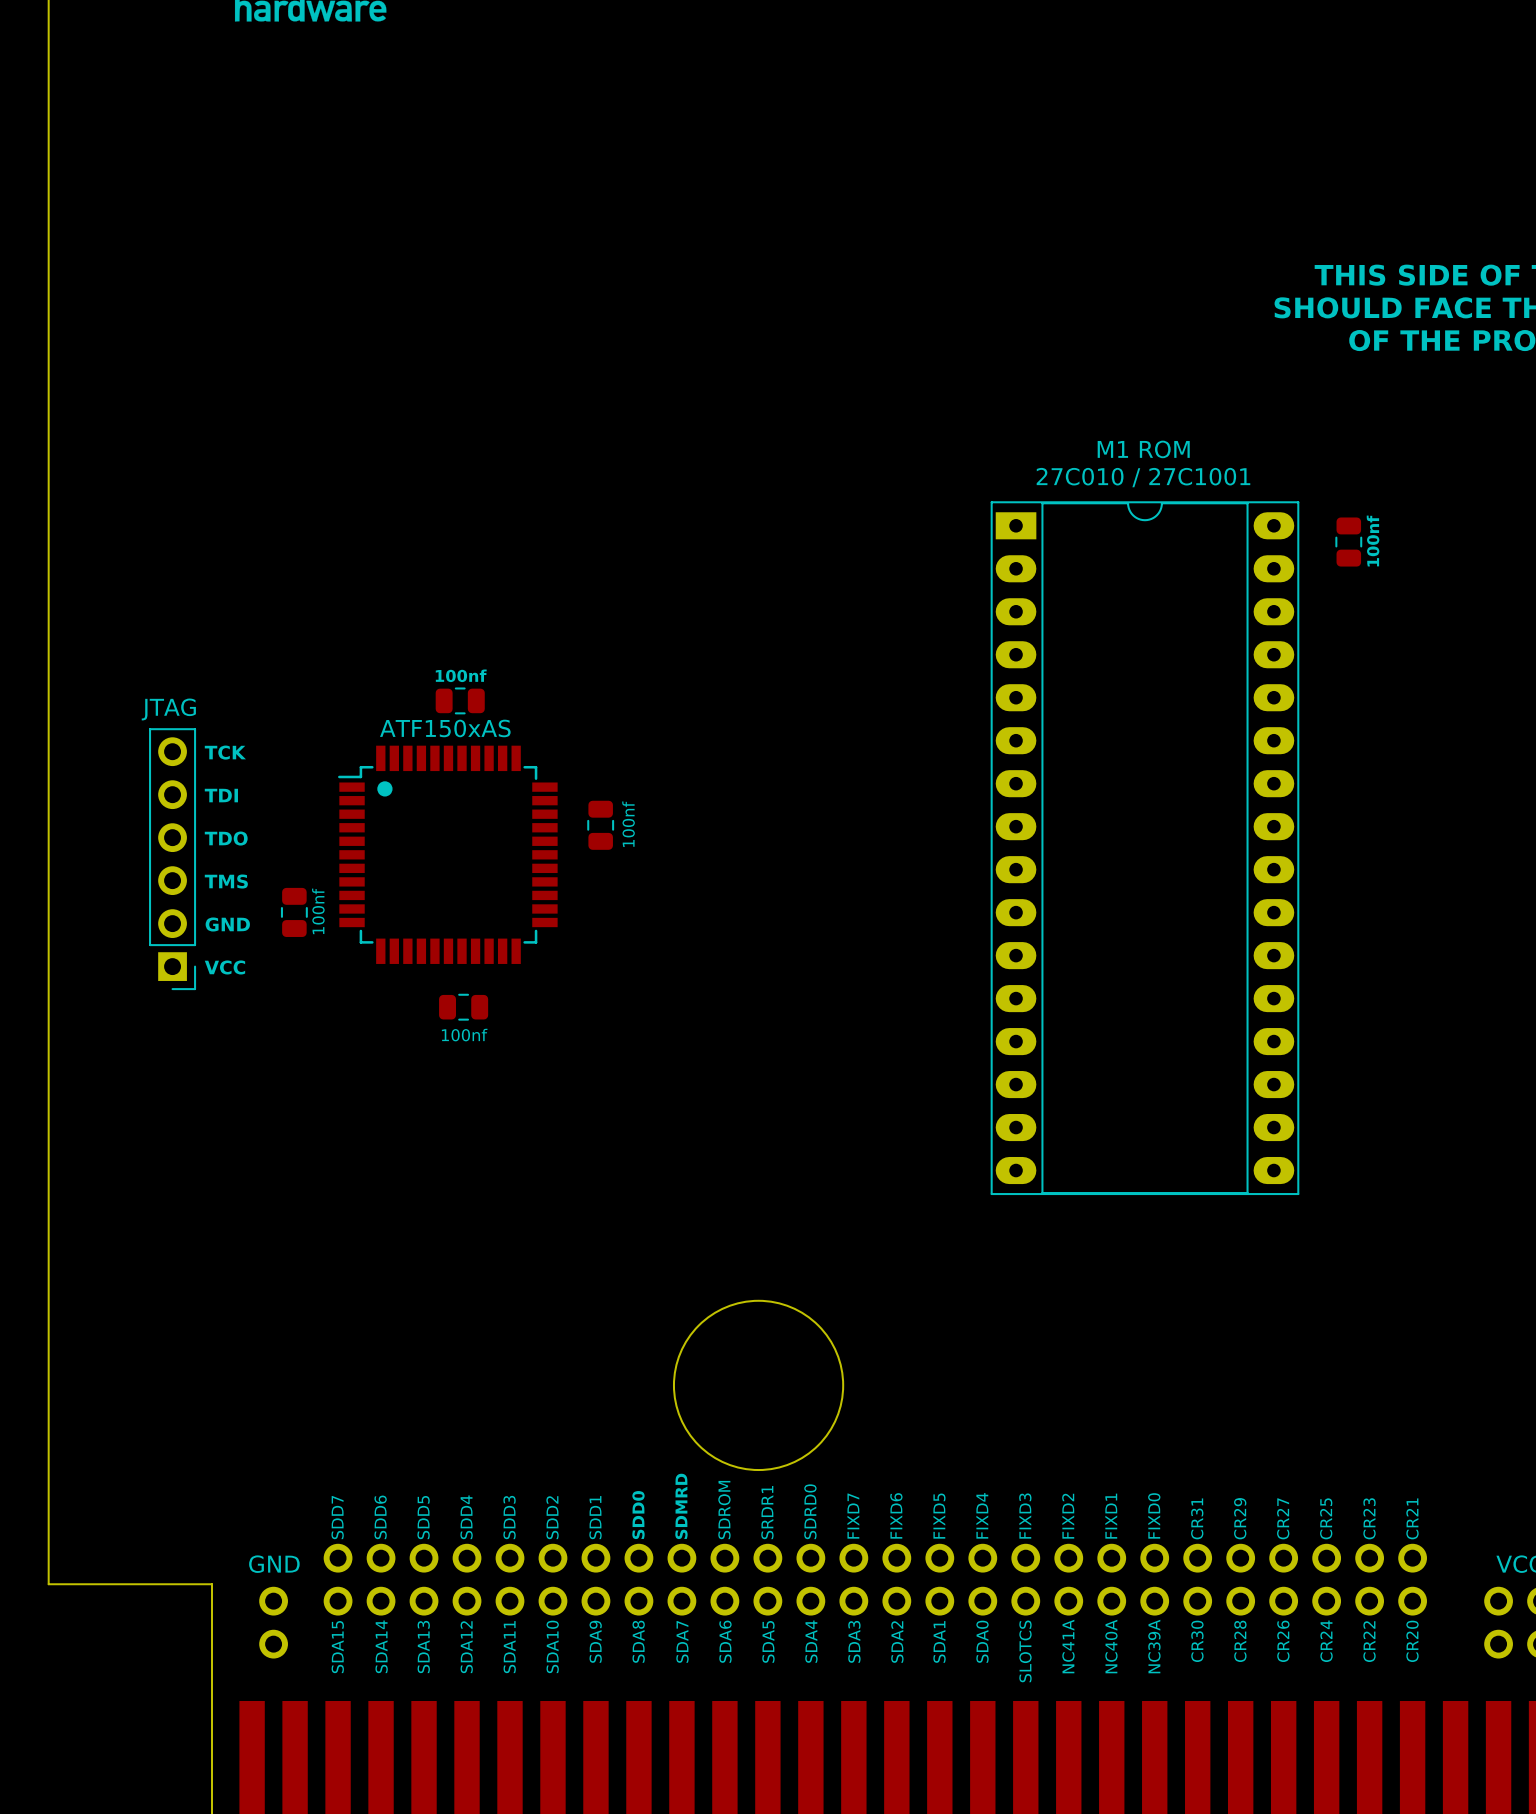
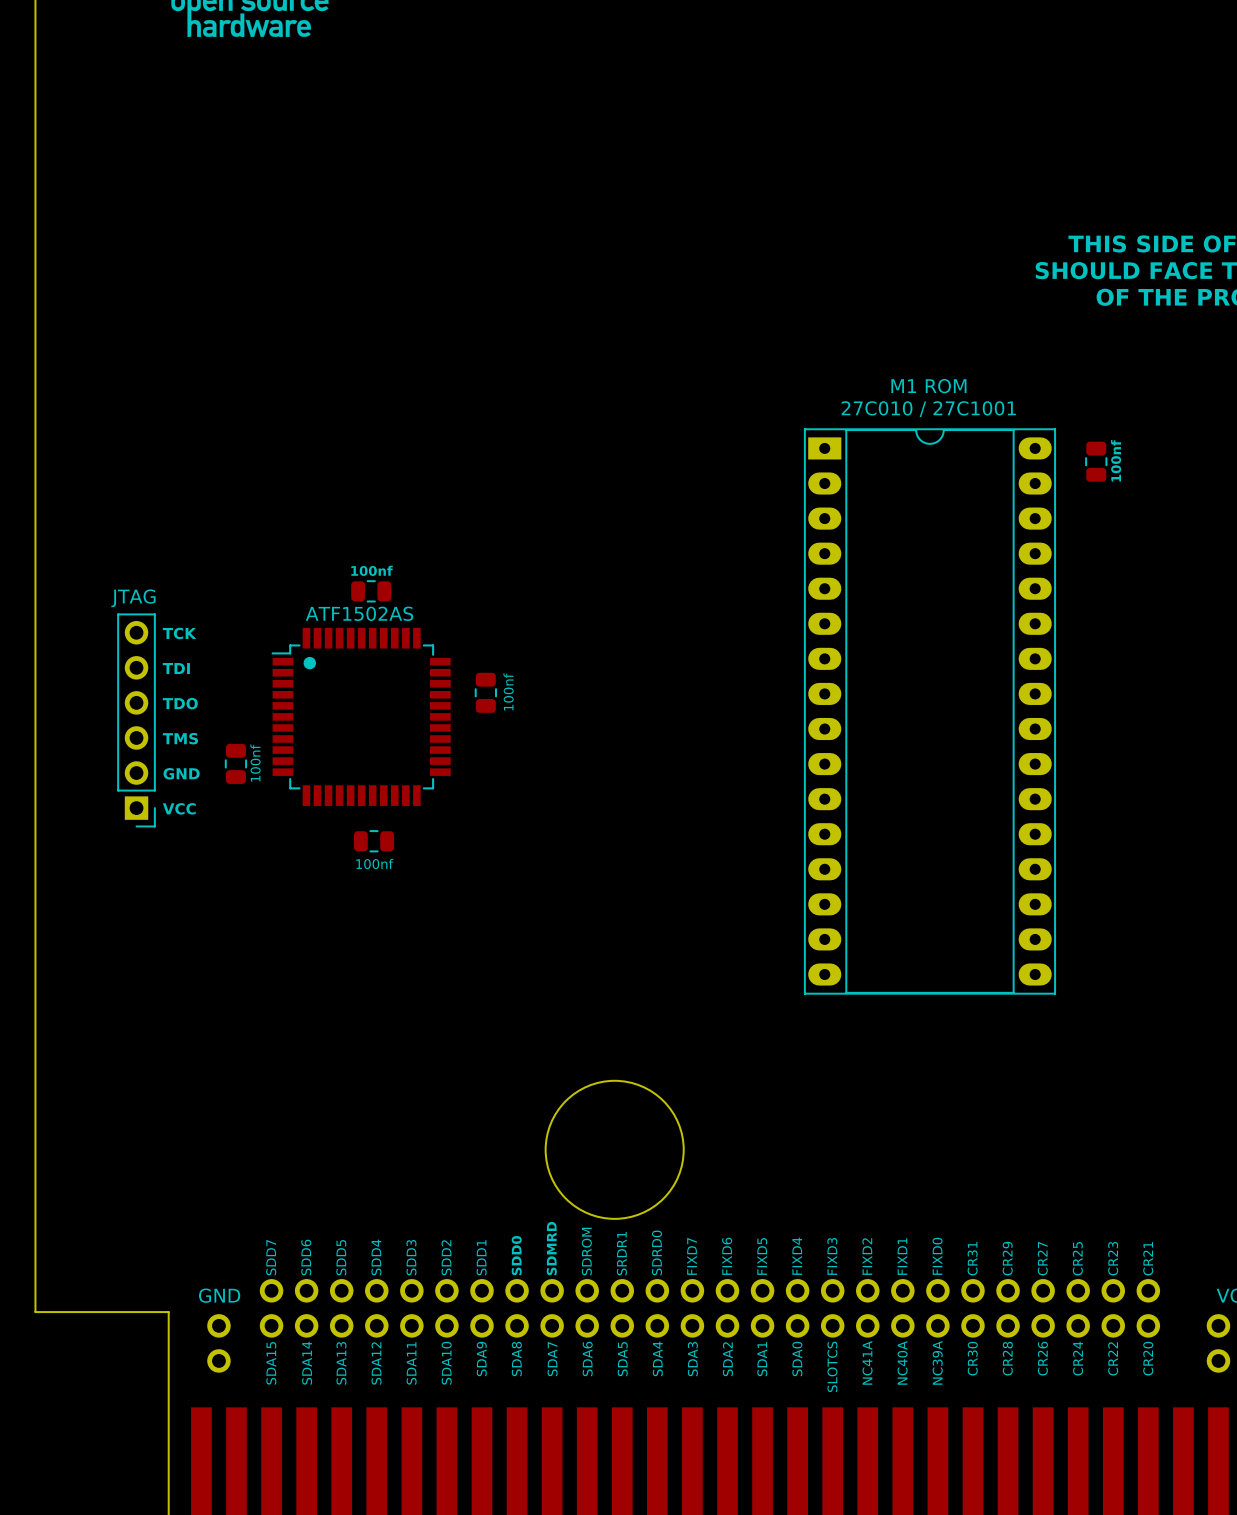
text: ATF150xAS (445, 728) -> ATF1502AS (359, 613)

